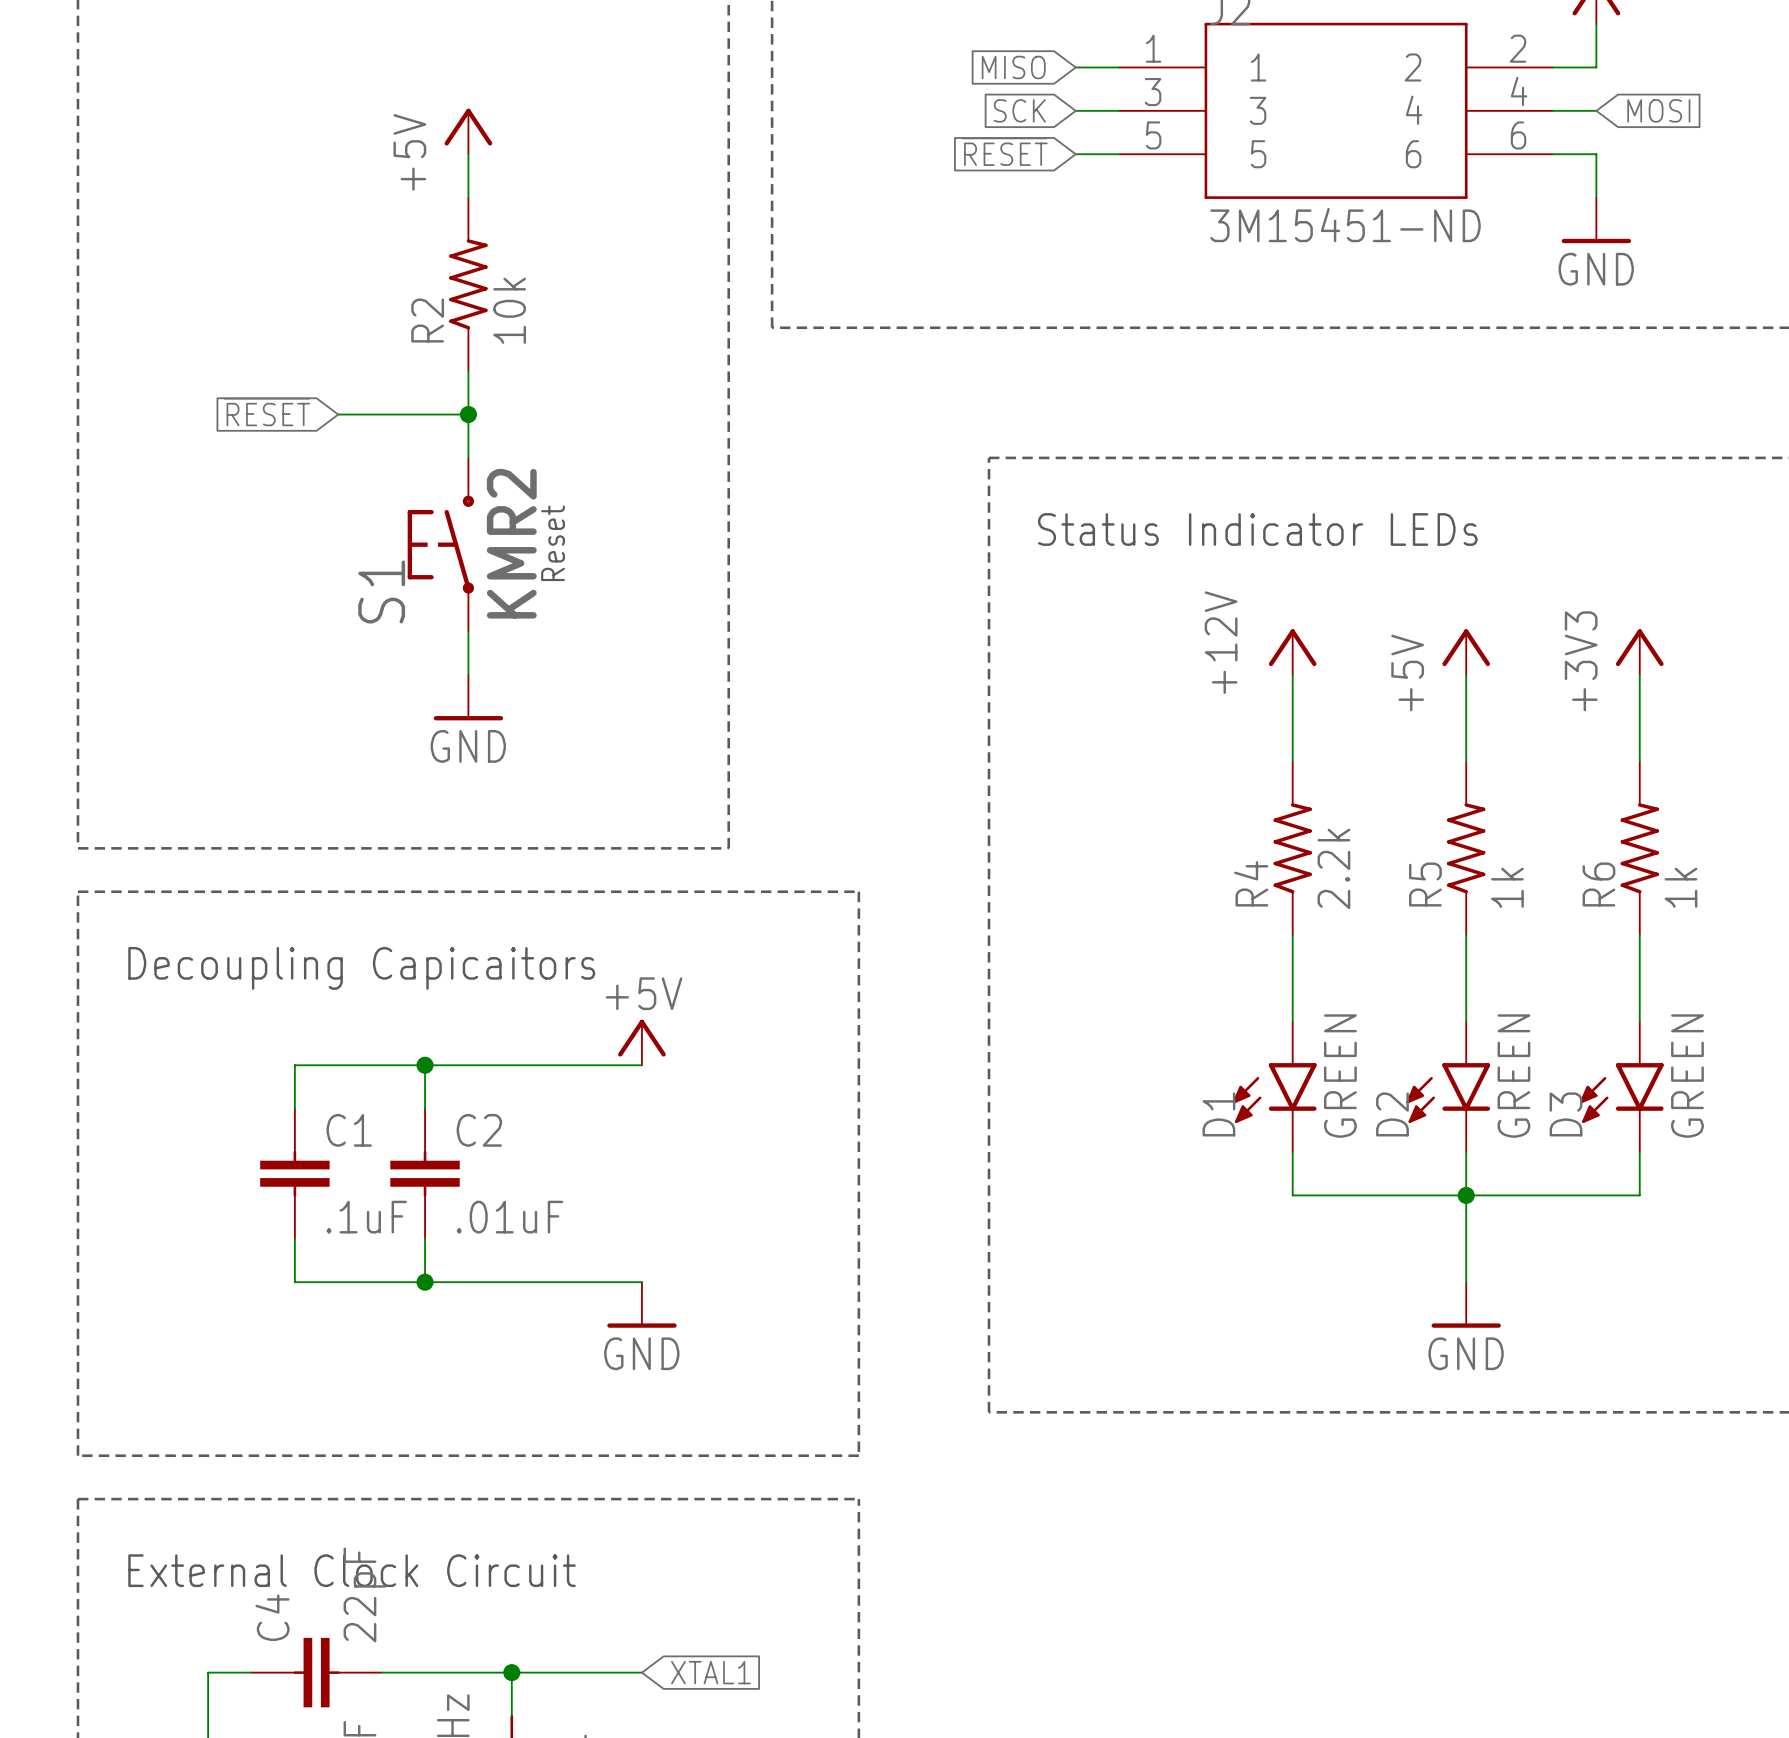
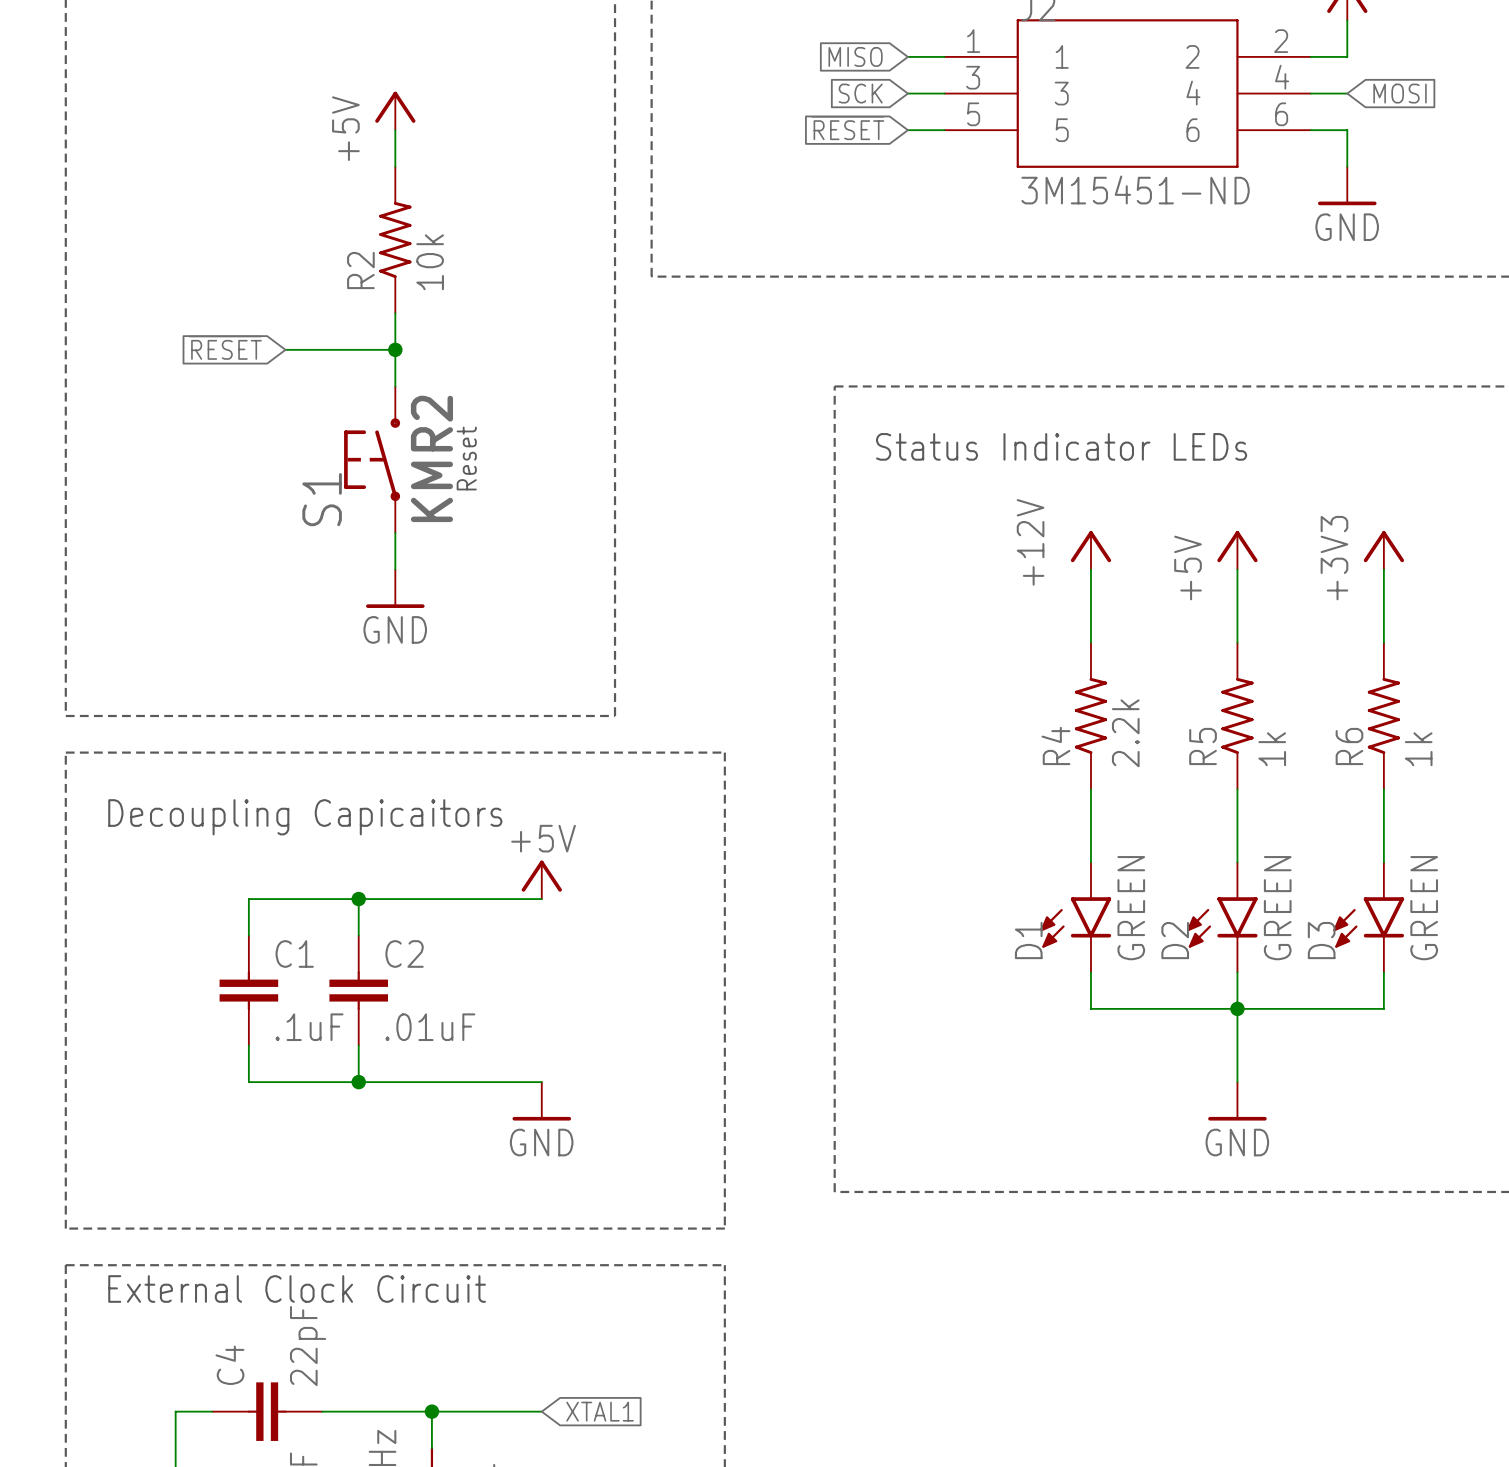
text position: External Clock Circuit (352, 1570) -> External Clock Circuit (297, 1288)

